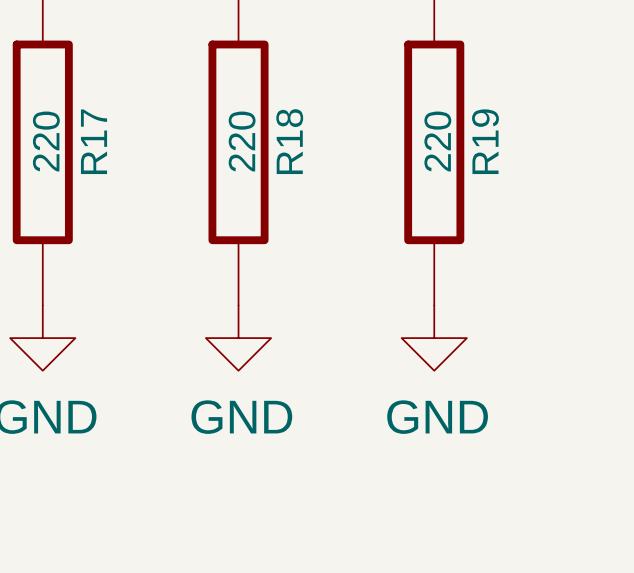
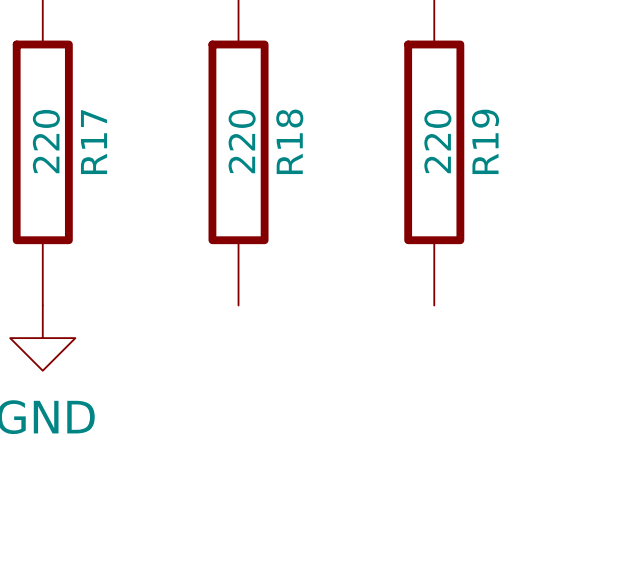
power symbol: GND (238, 338) -> none
power symbol: GND (434, 338) -> none

